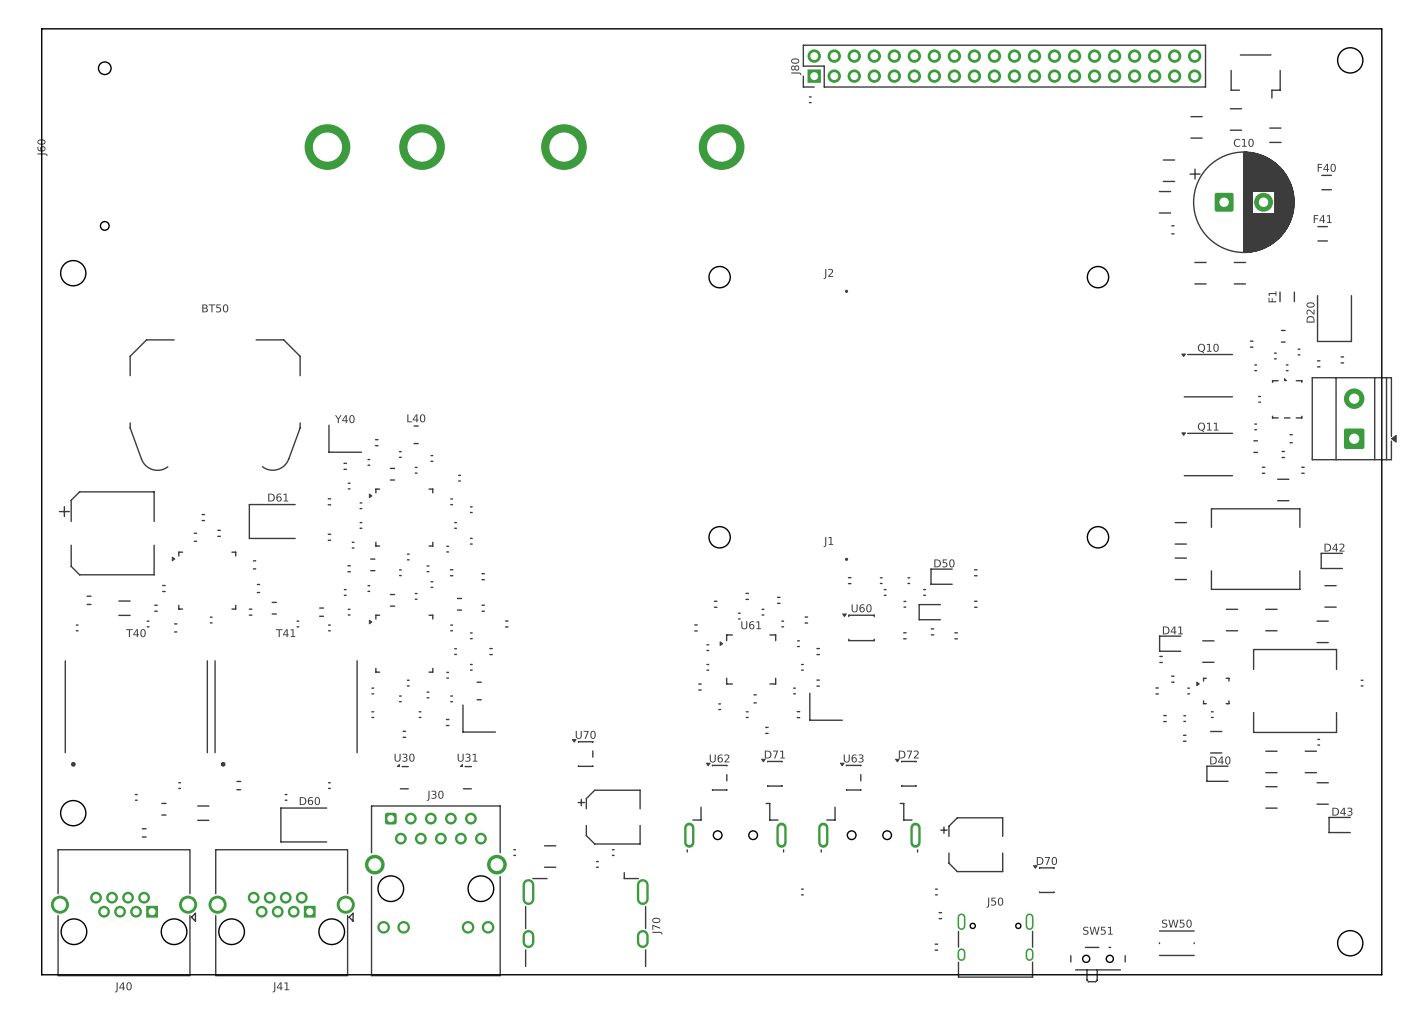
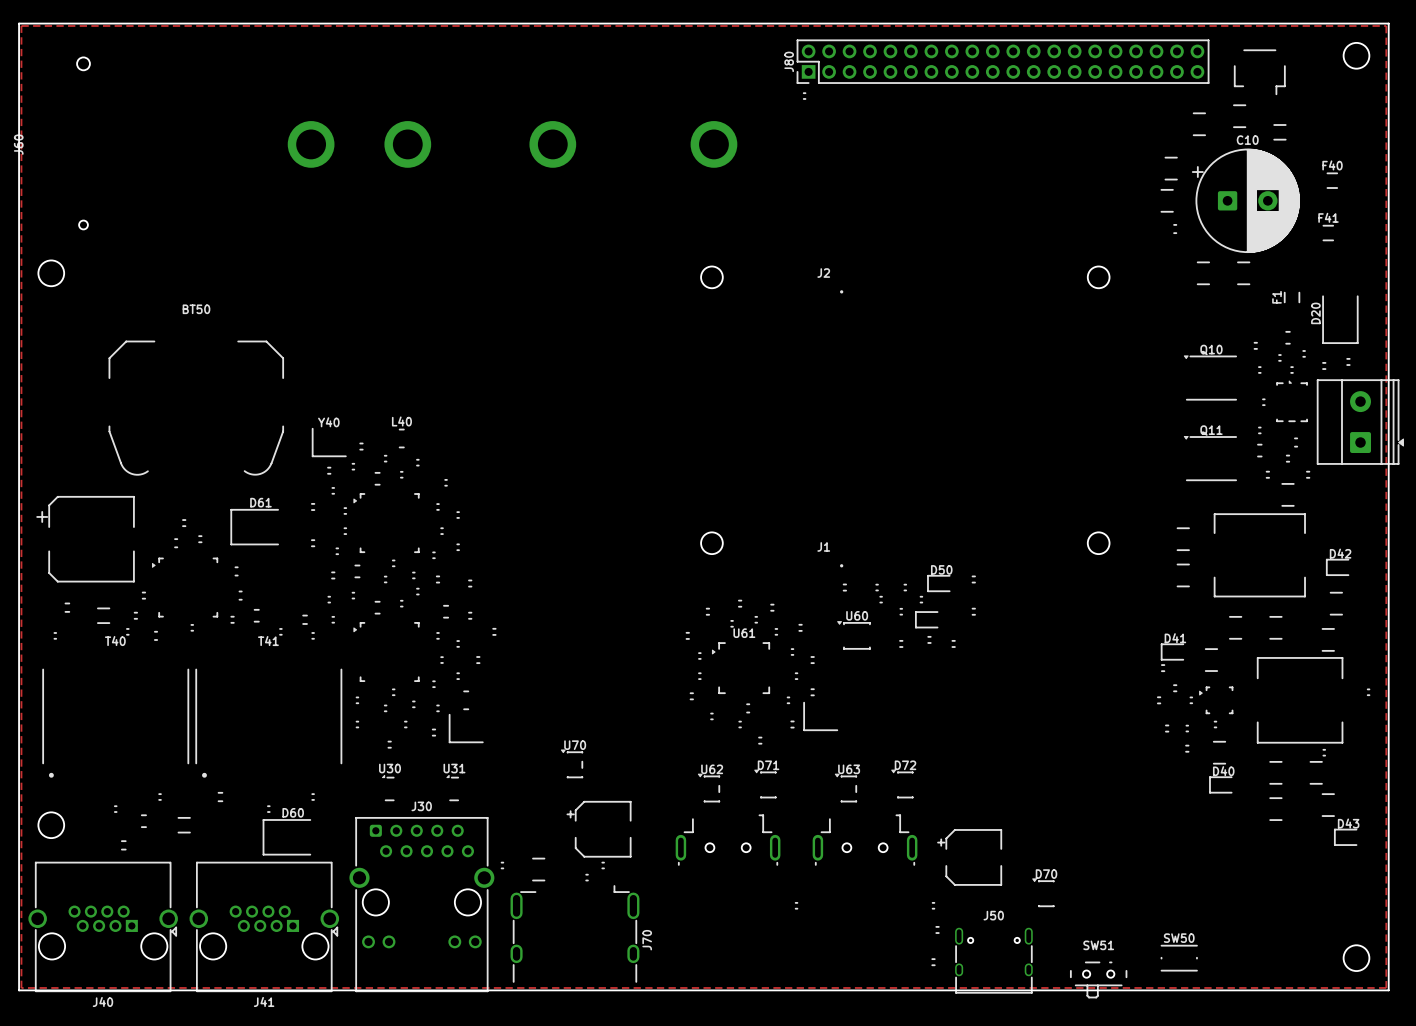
zone outline: none -> (21, 25) (1386, 25) (1386, 987) (21, 987) (21, 25)

